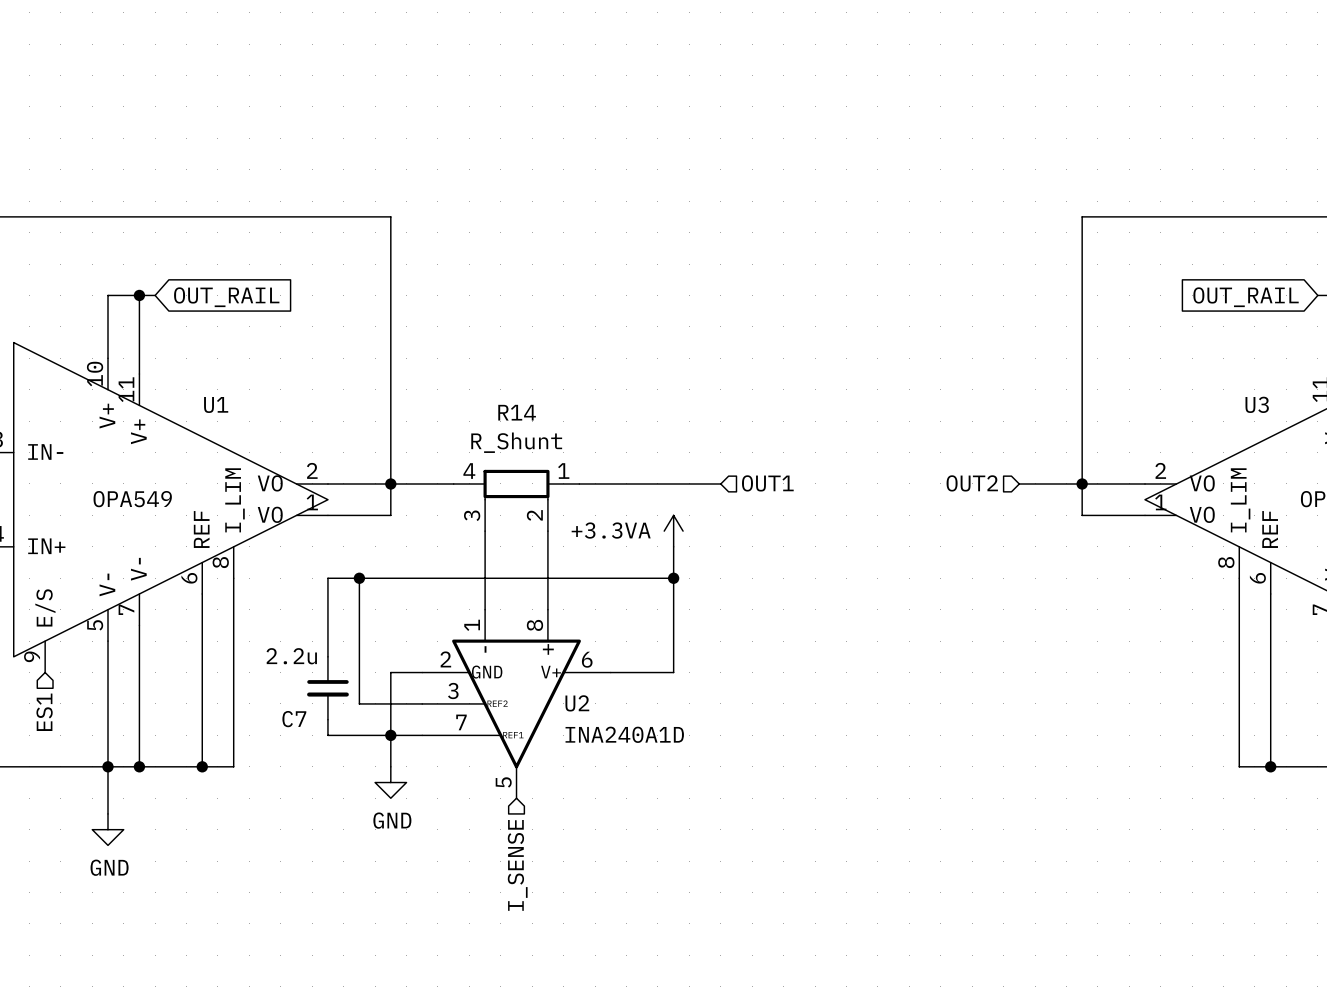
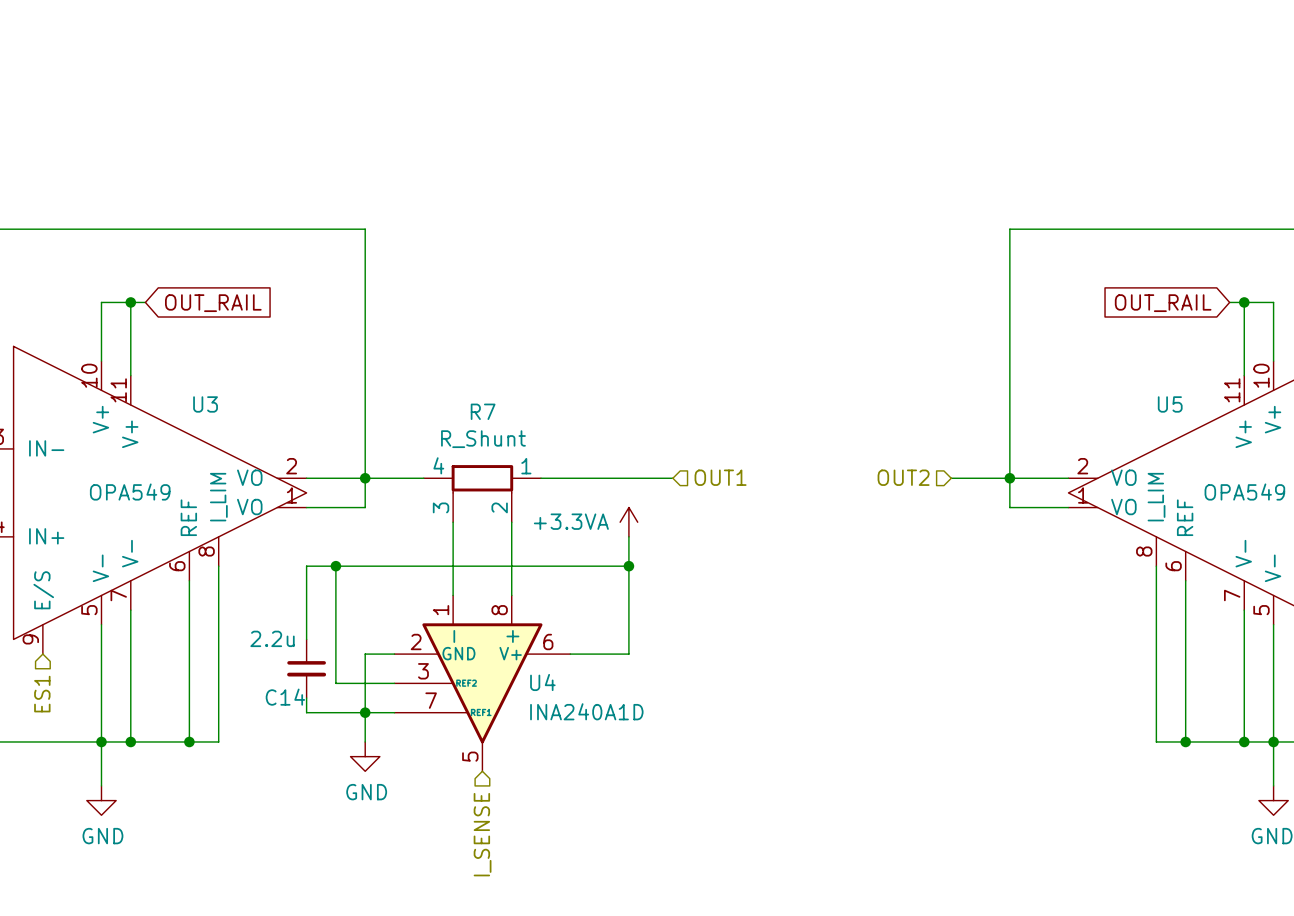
U1 name: U1 (216, 404) -> U3 (205, 404)
U3 name: U3 (1257, 404) -> U5 (1170, 404)
R14 name: R14 (517, 412) -> R7 (483, 411)
U2 name: U2 (577, 703) -> U4 (542, 682)
C7 name: C7 (294, 719) -> C14 (285, 697)

